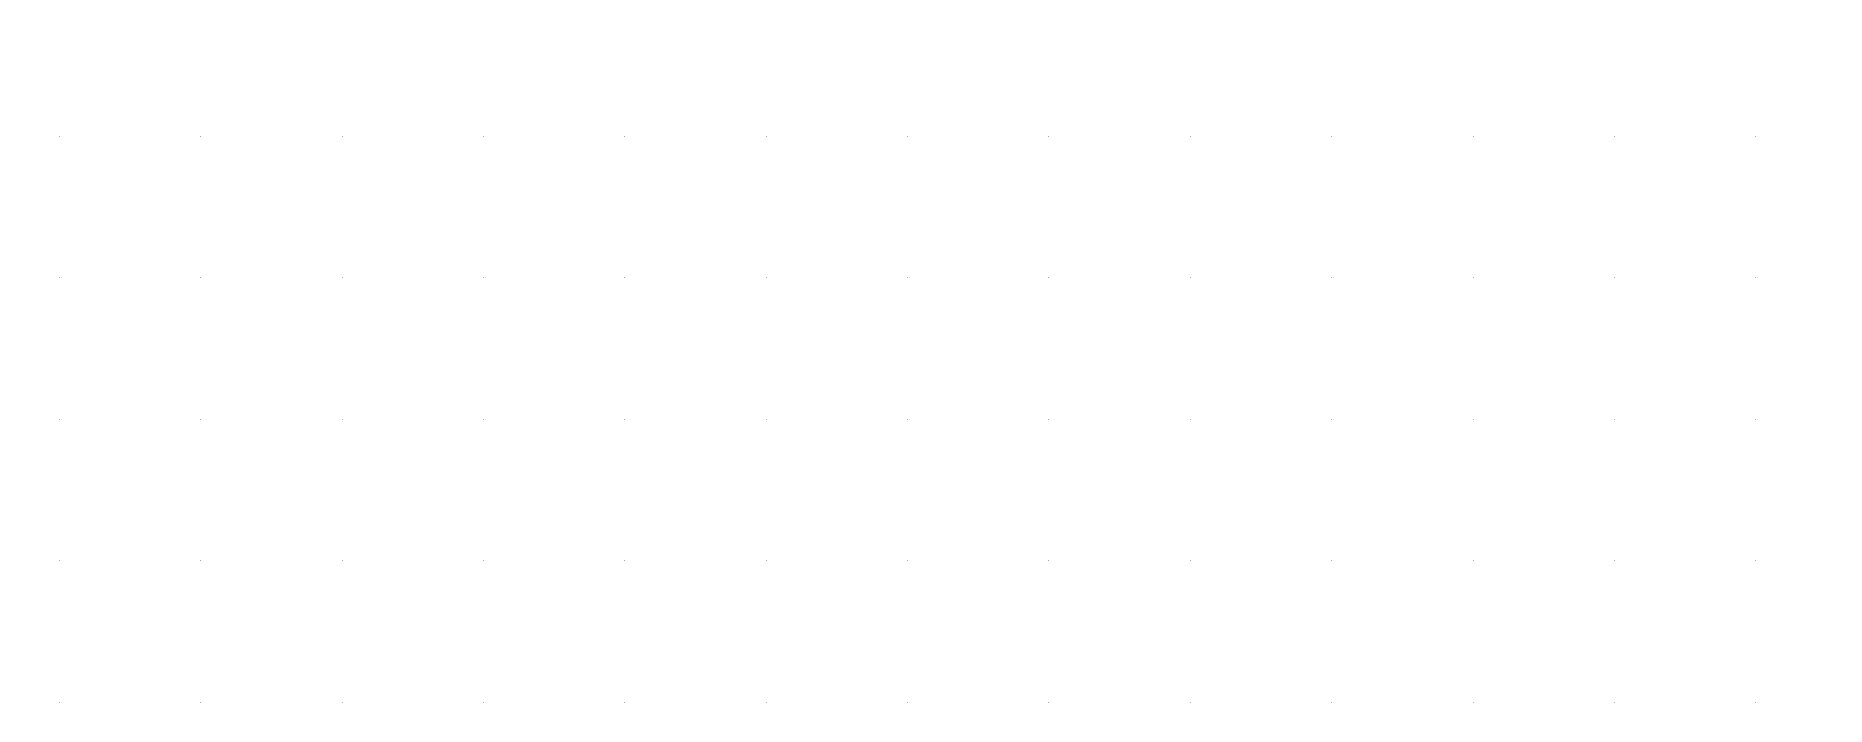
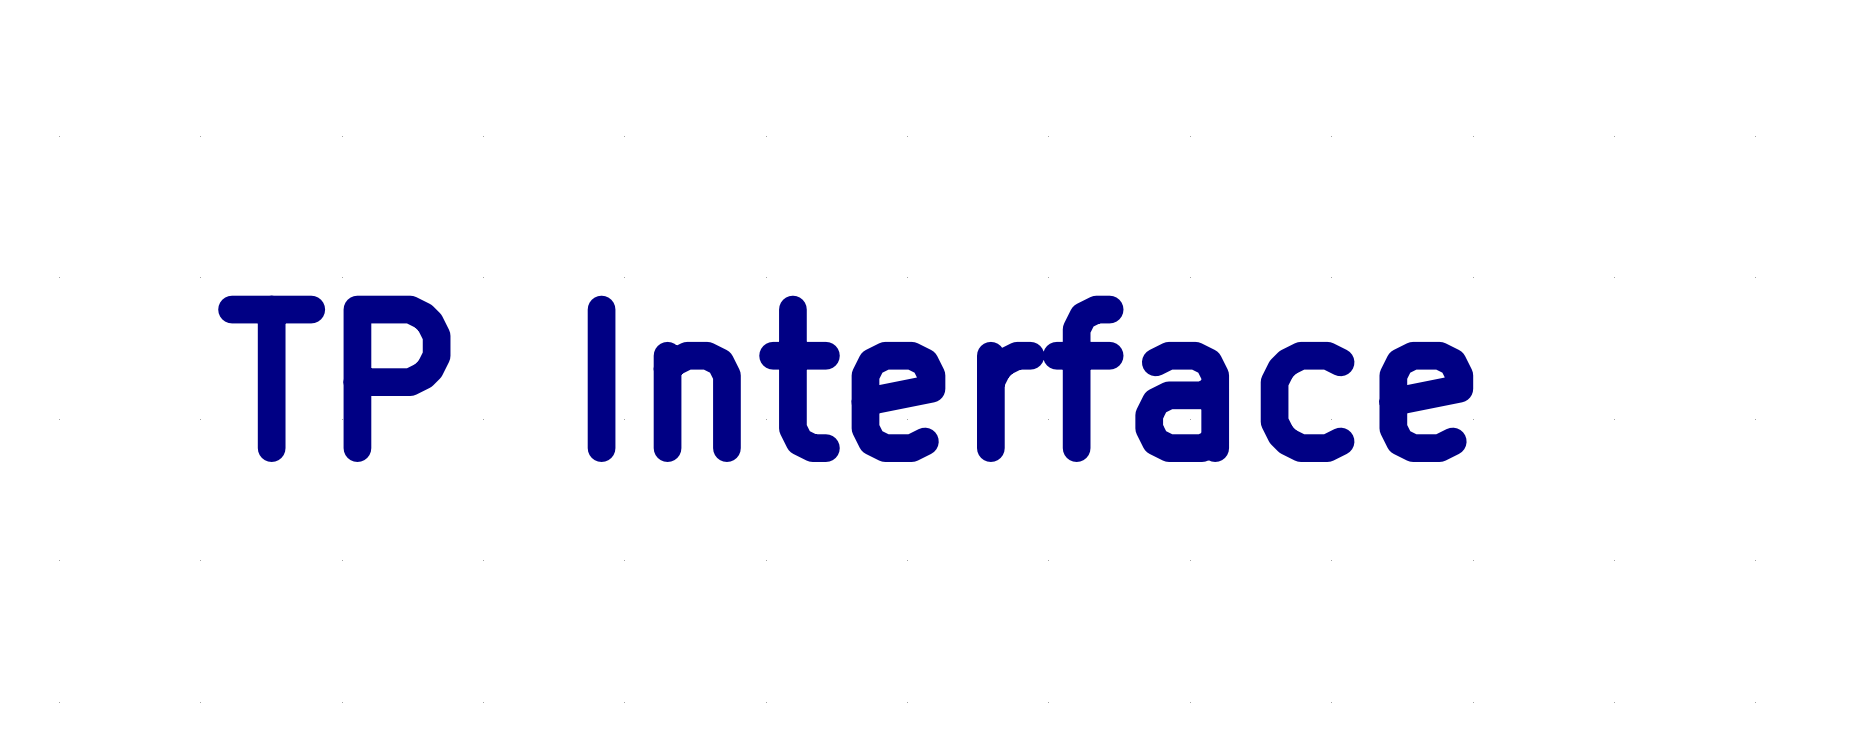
text: none -> TP Interface (845, 378)

